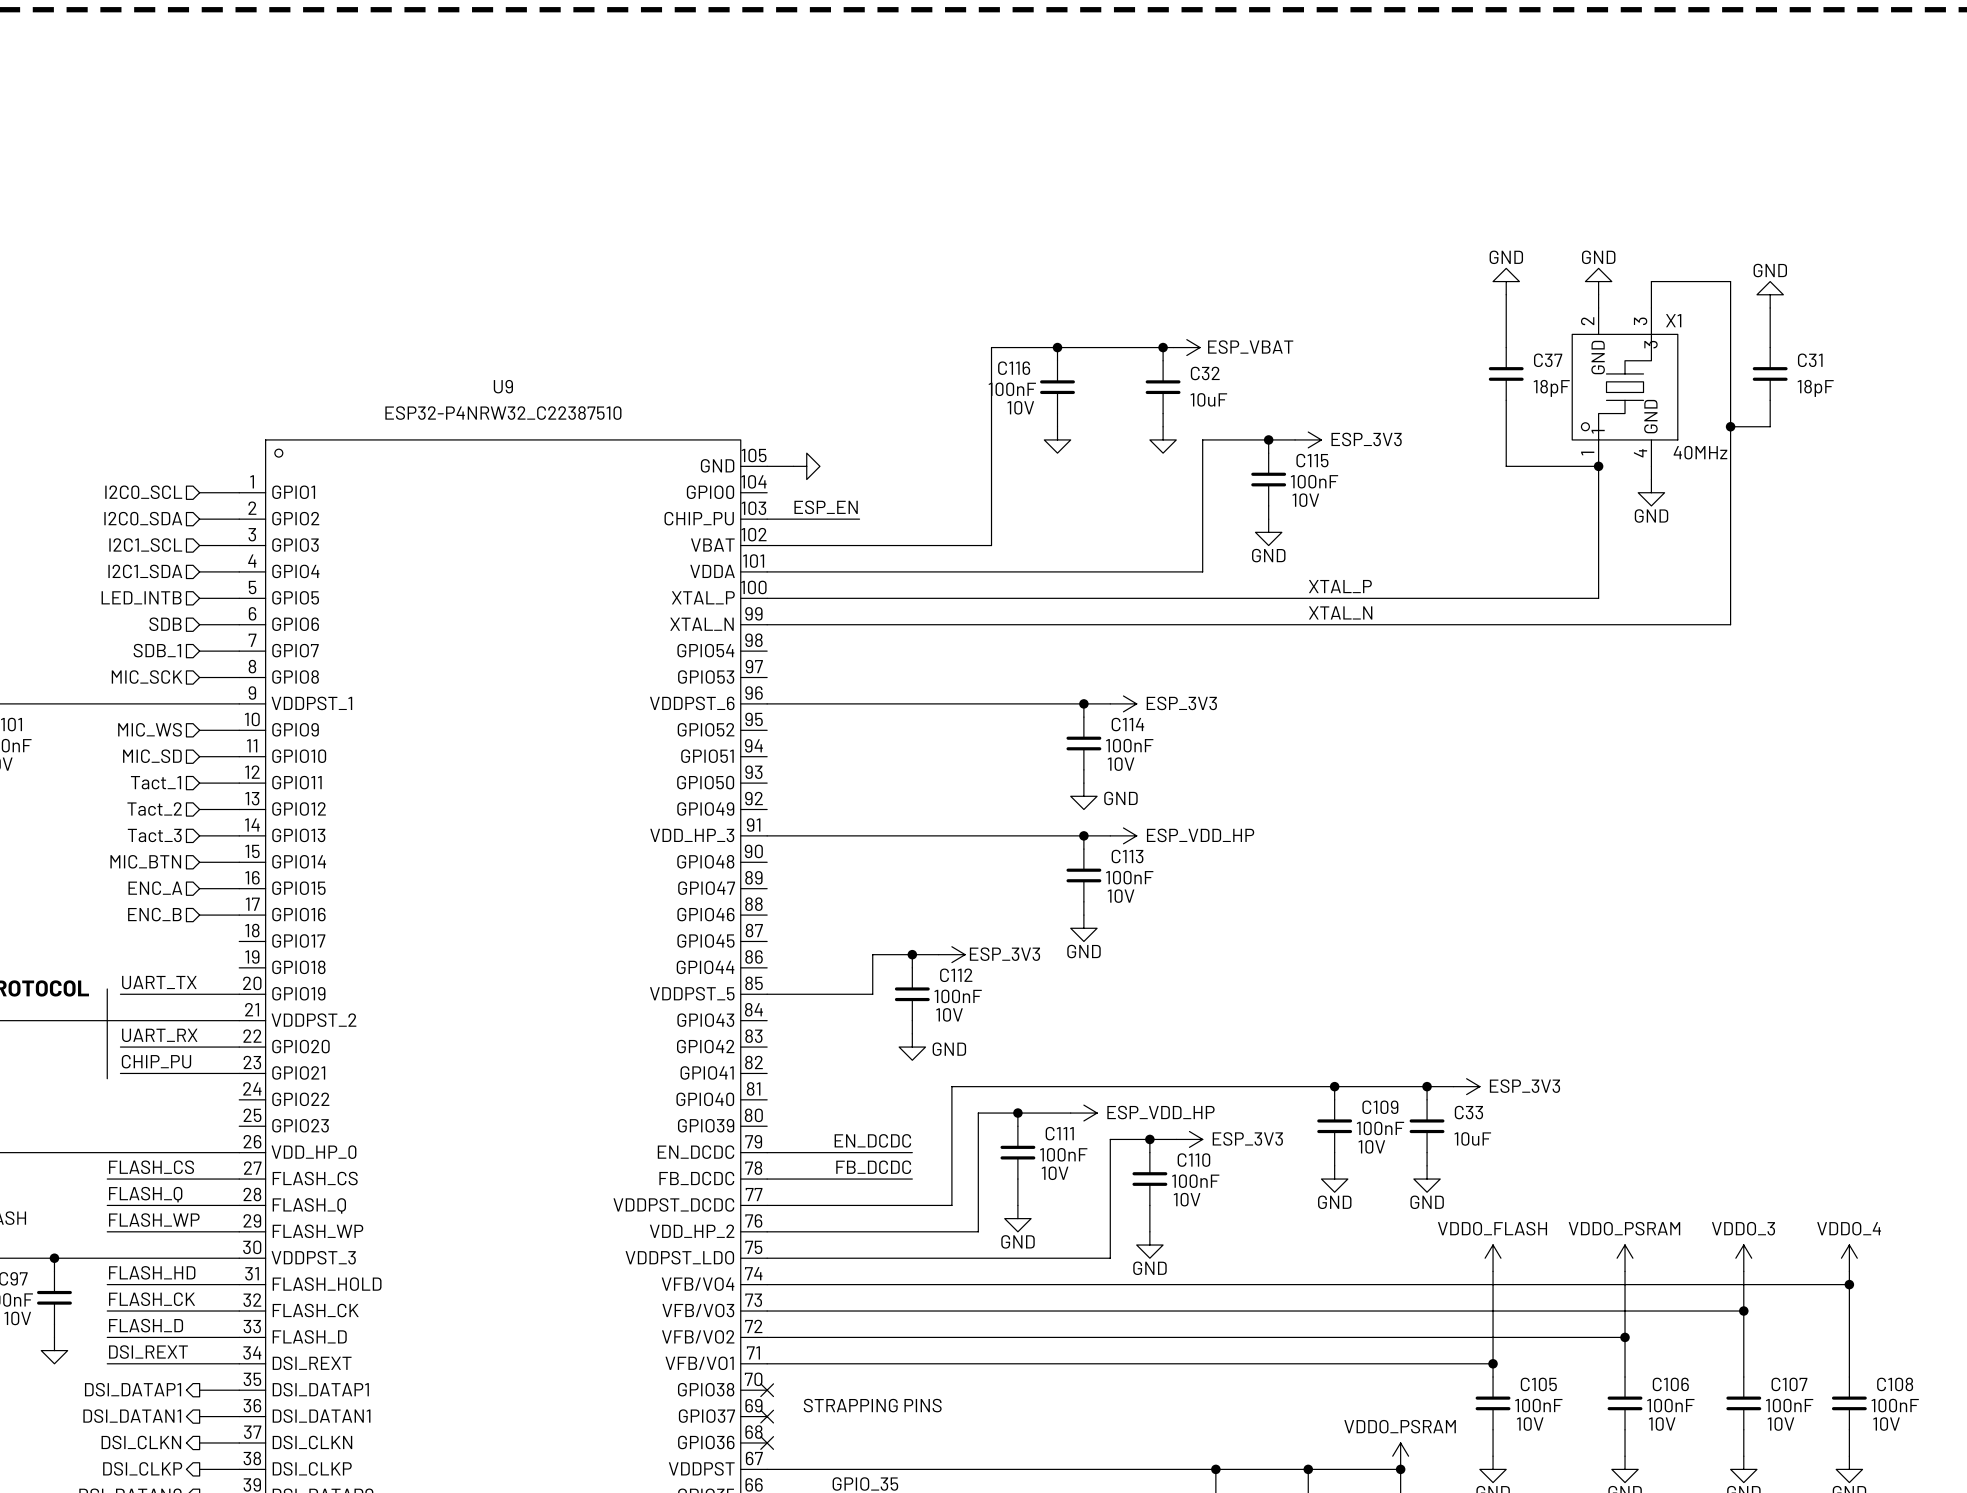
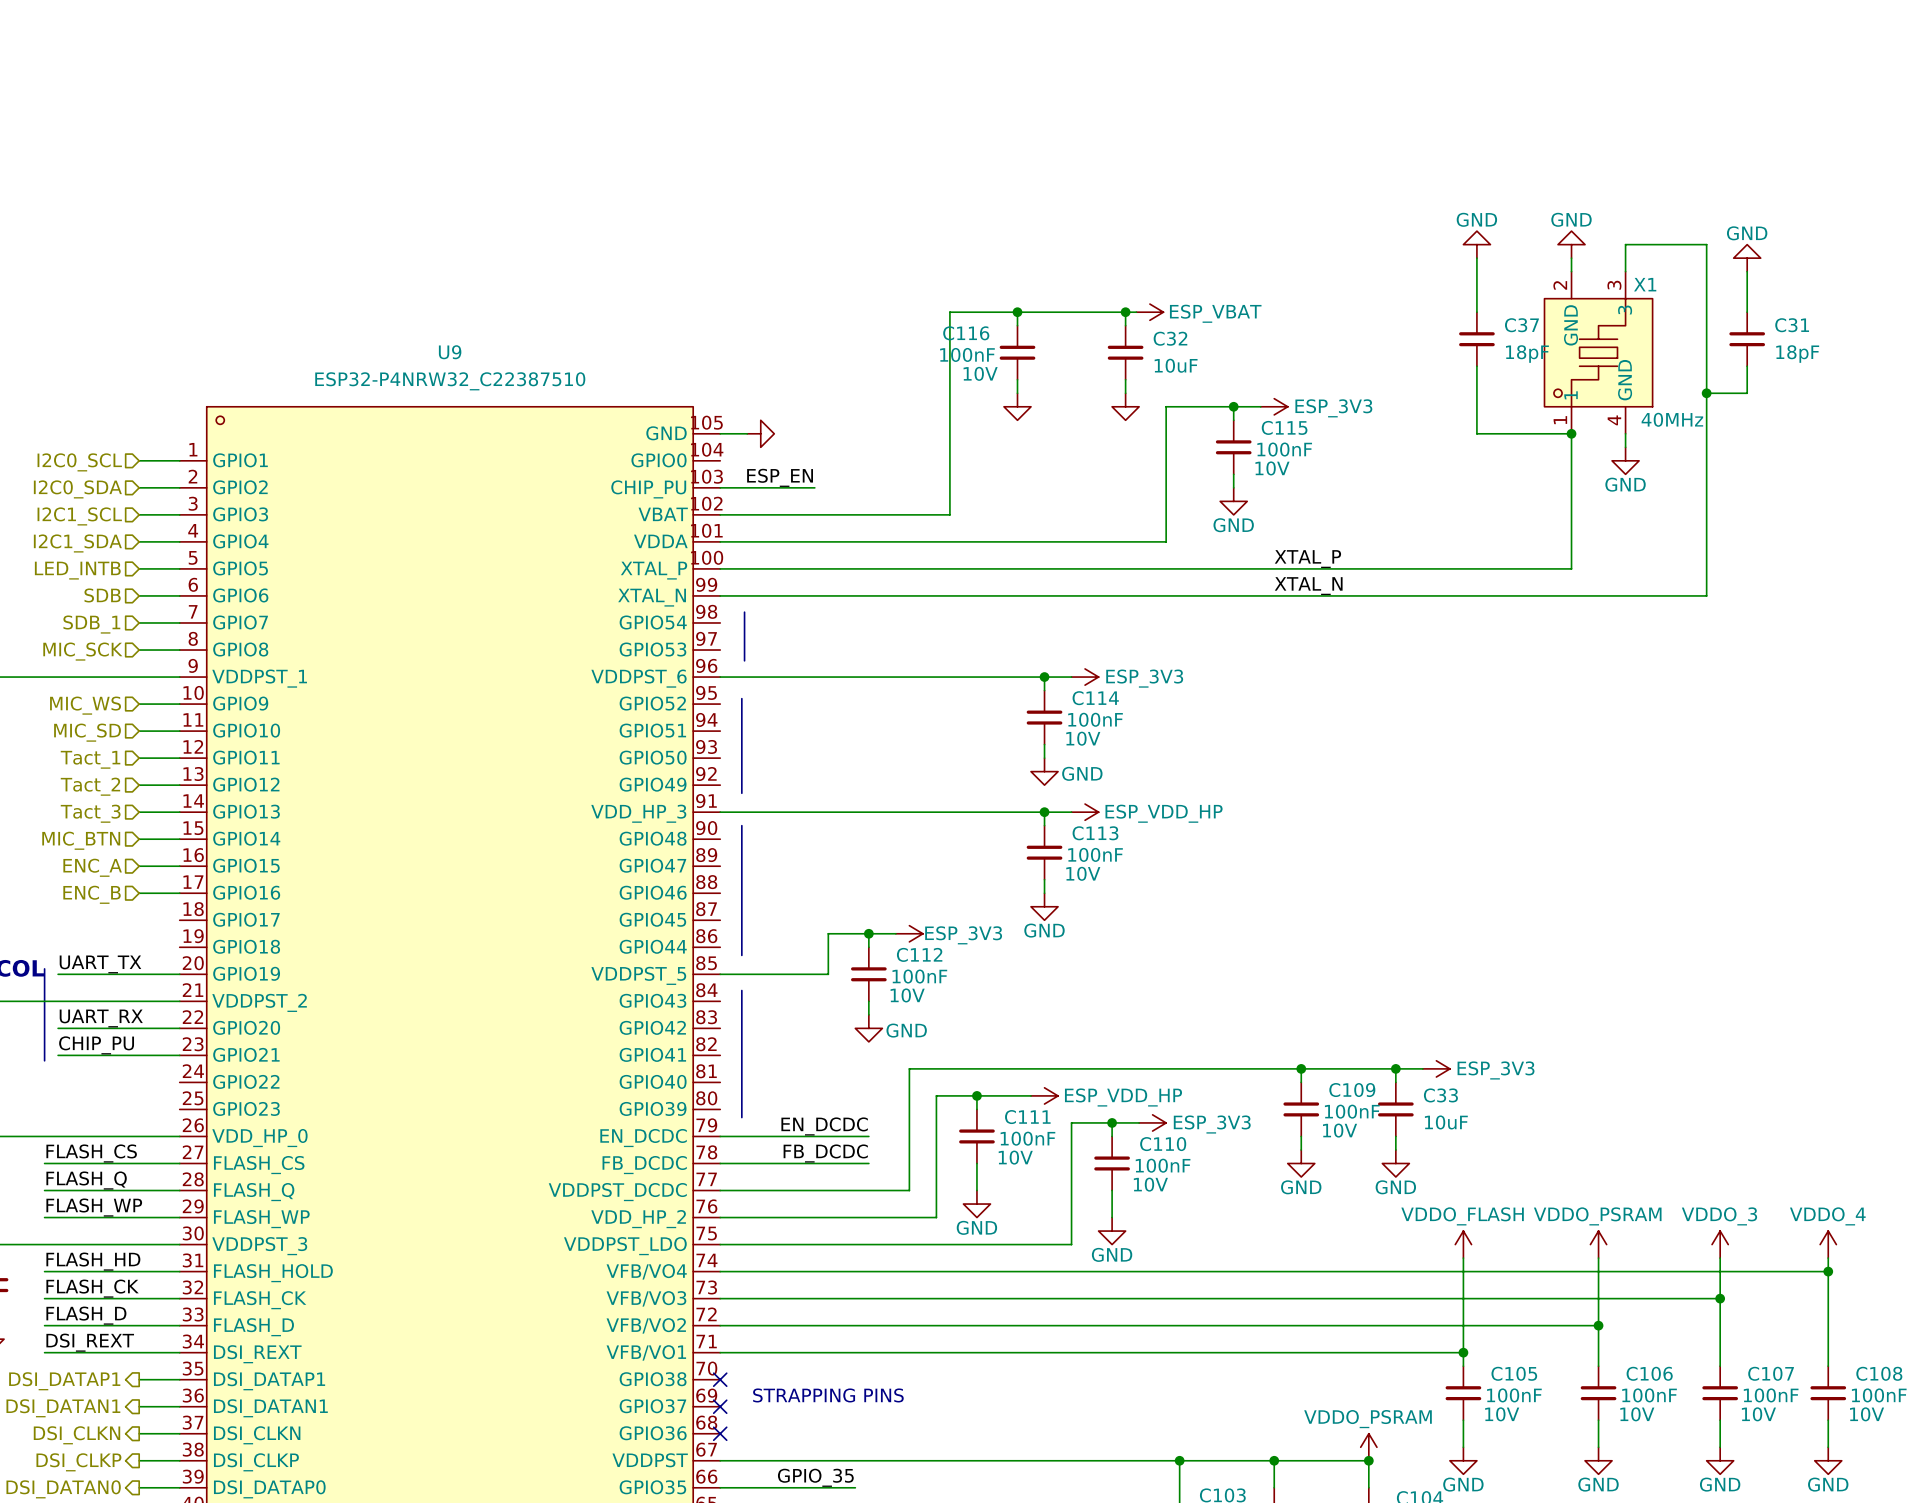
line: none -> (744, 612) (744, 660)
line: none -> (741, 698) (741, 793)
line: none -> (741, 825) (741, 955)
line: none -> (741, 990) (741, 1117)

